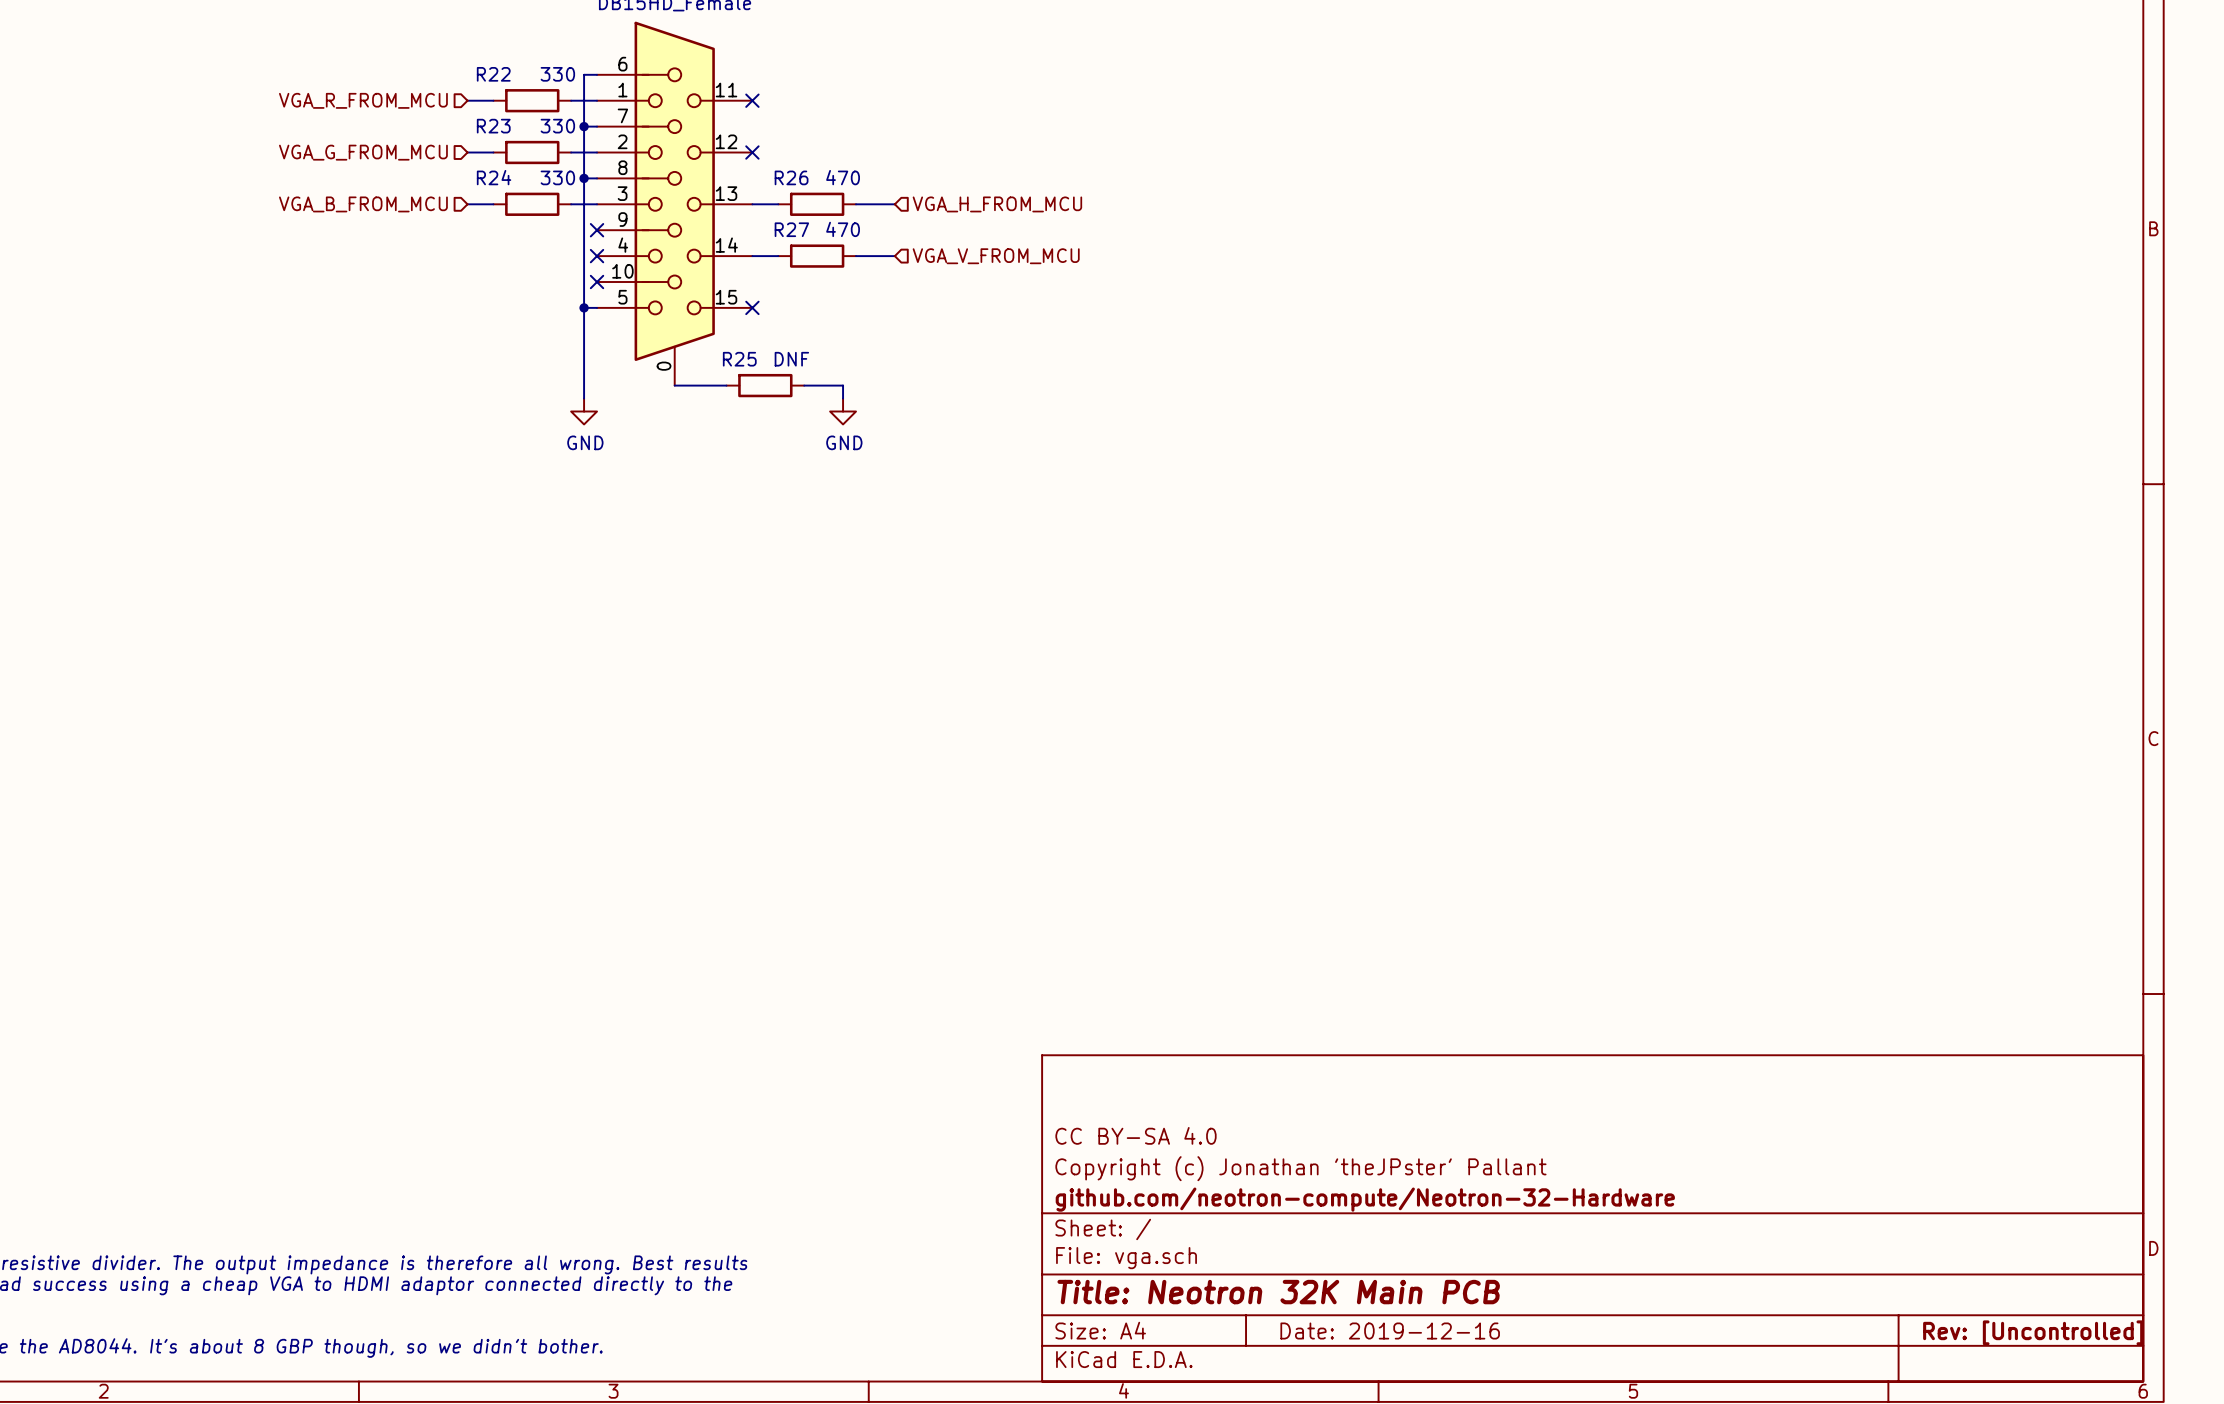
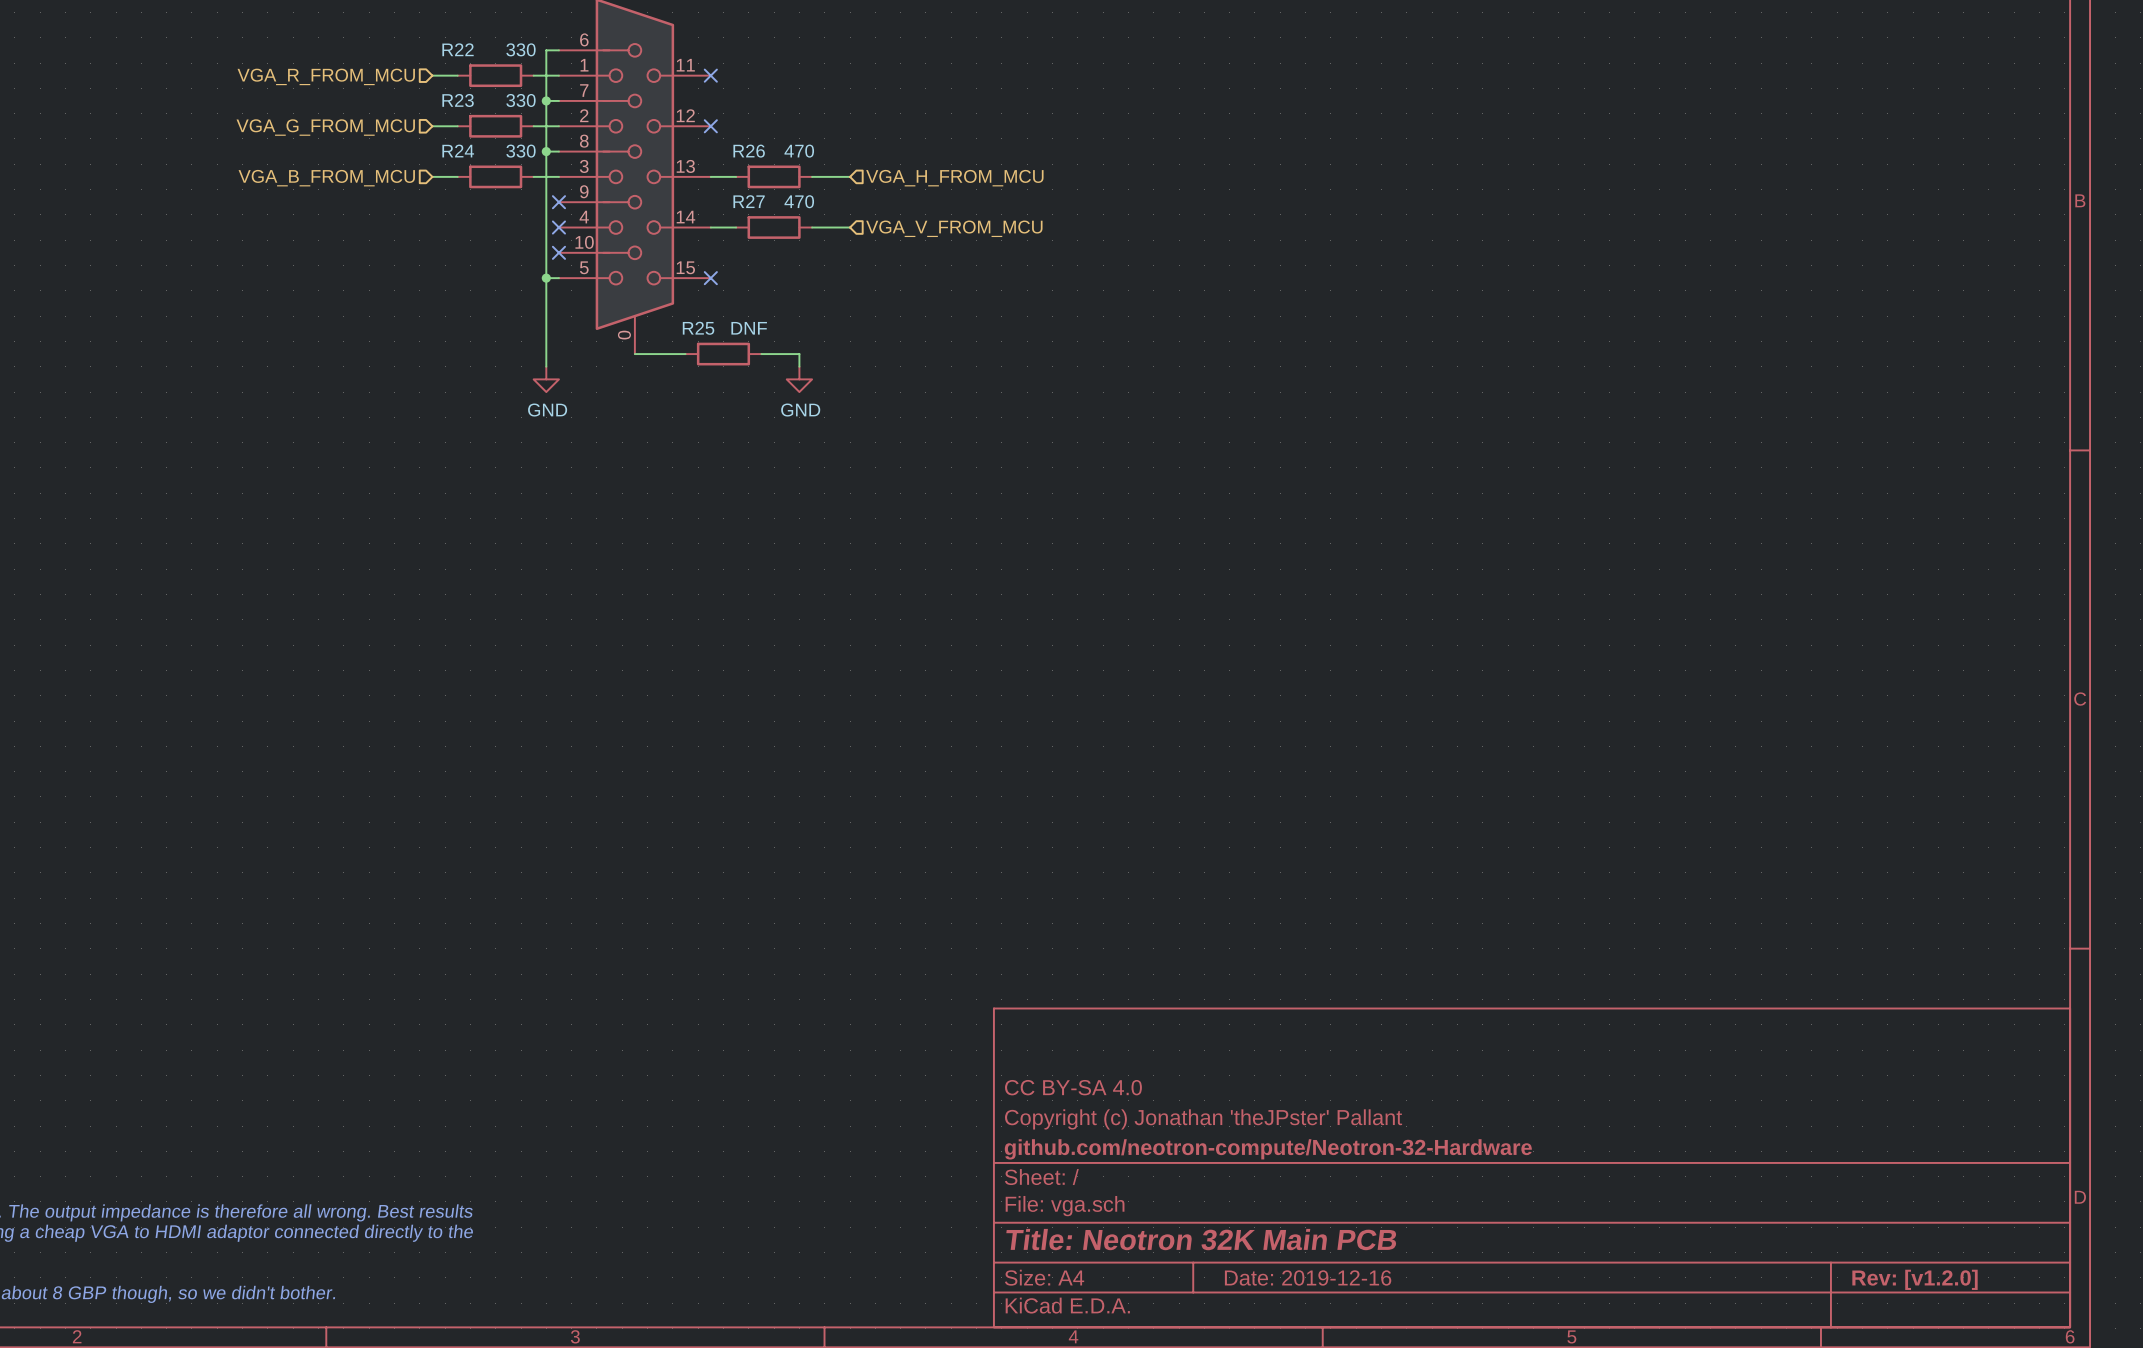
title block: Rev: [Uncontrolled] (2033, 1332) -> Rev: [v1.2.0] (1915, 1279)

